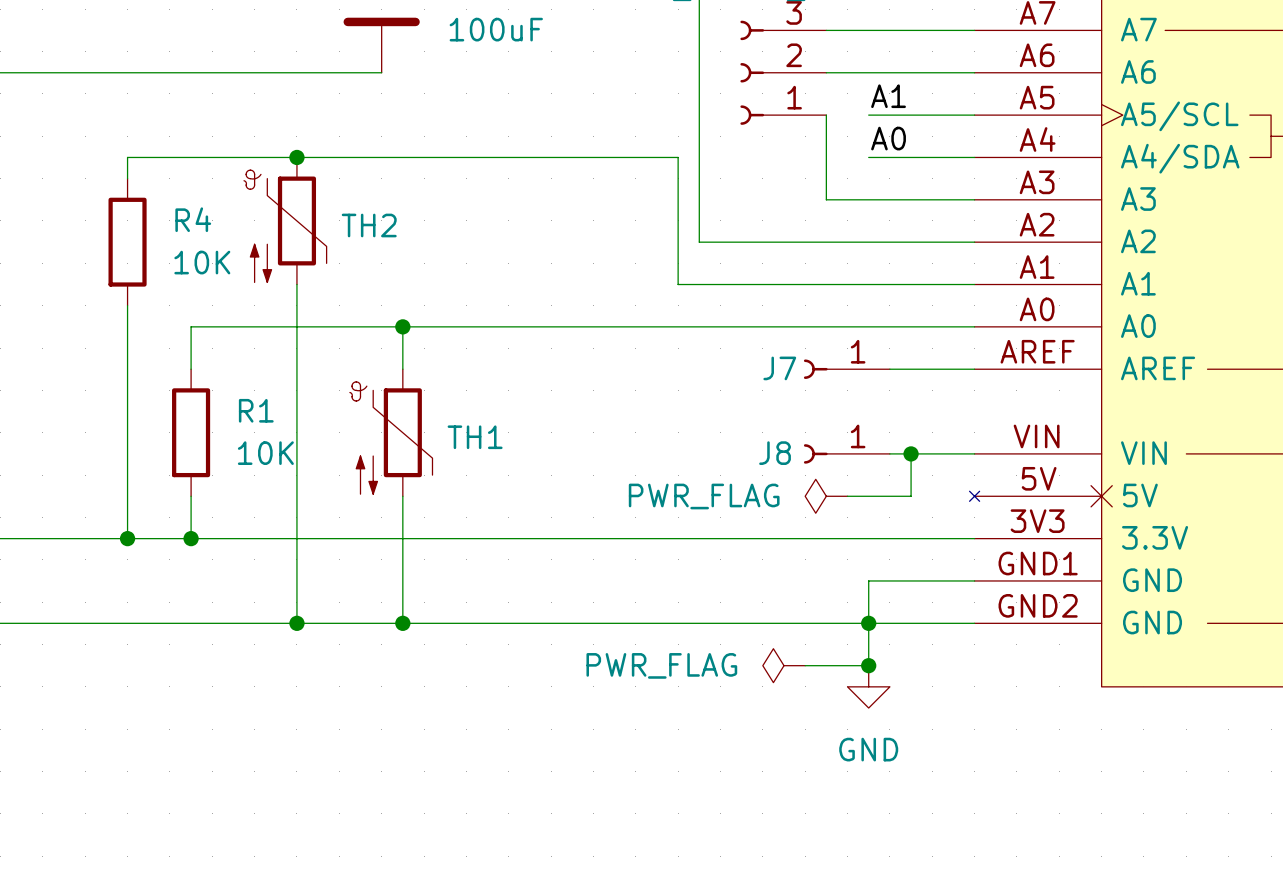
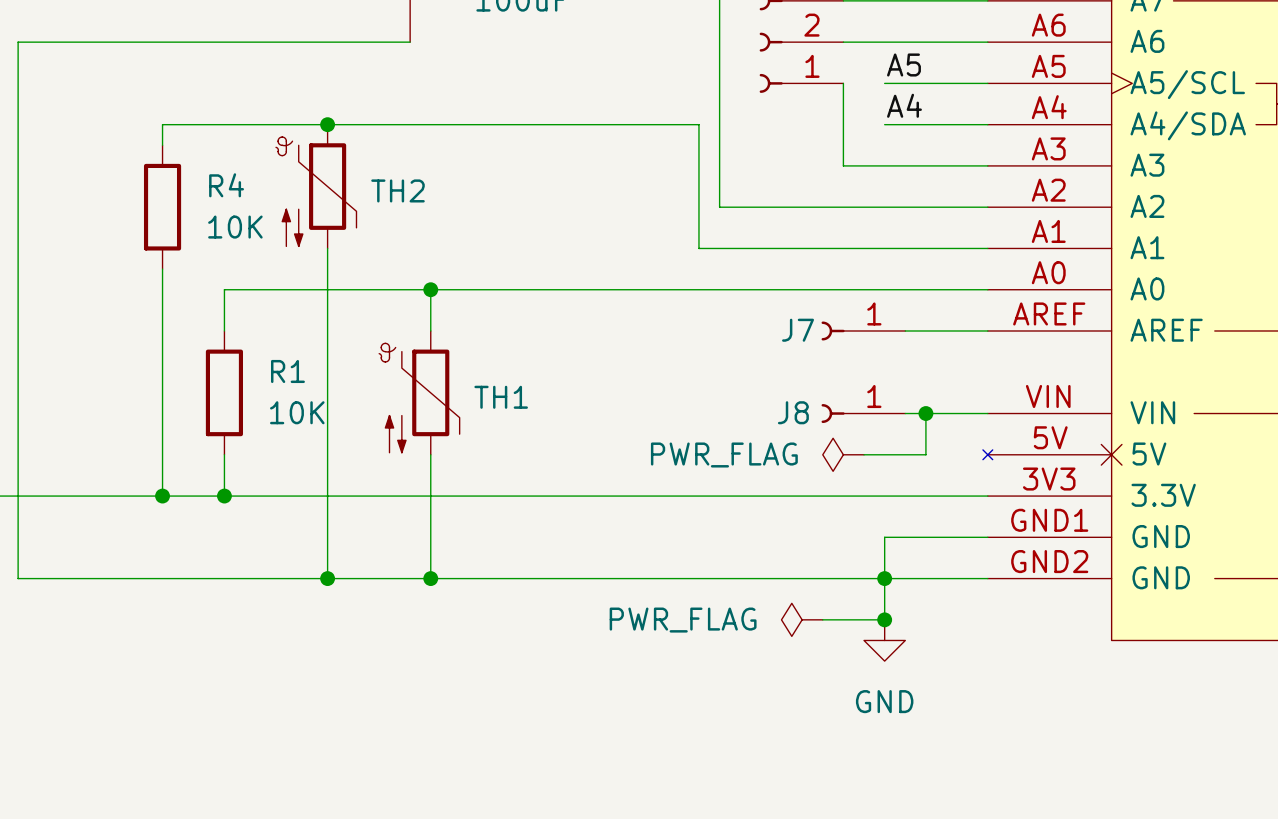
label: A1 (888, 96) -> A5 (903, 64)
label: A0 (888, 138) -> A4 (904, 105)

